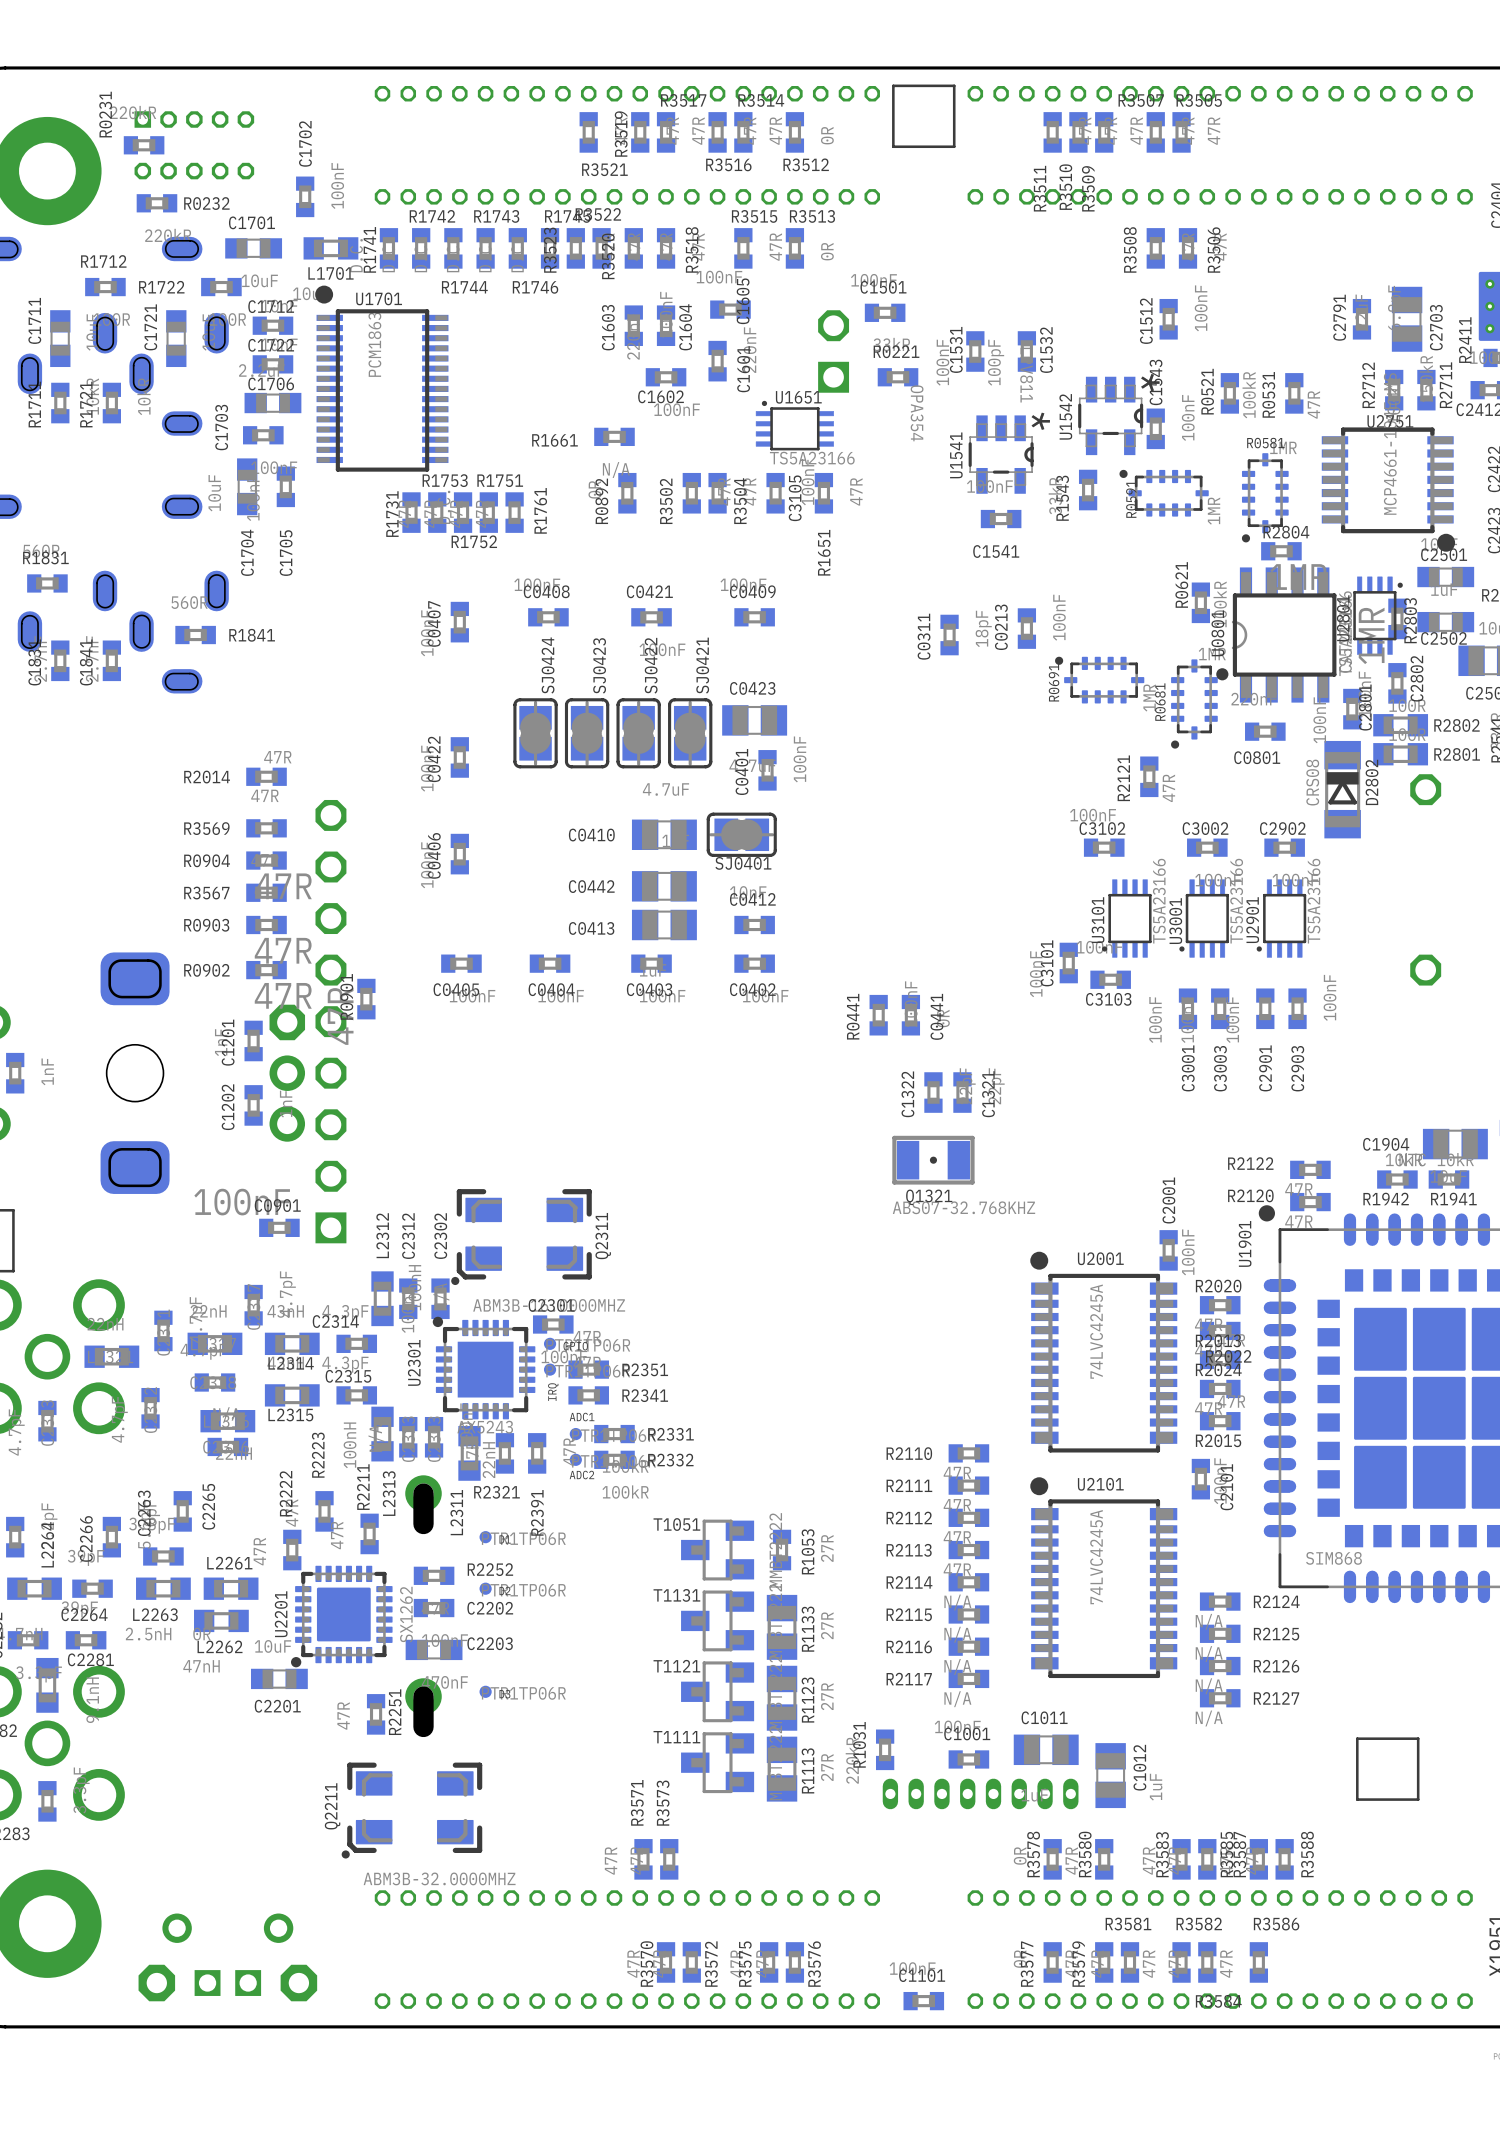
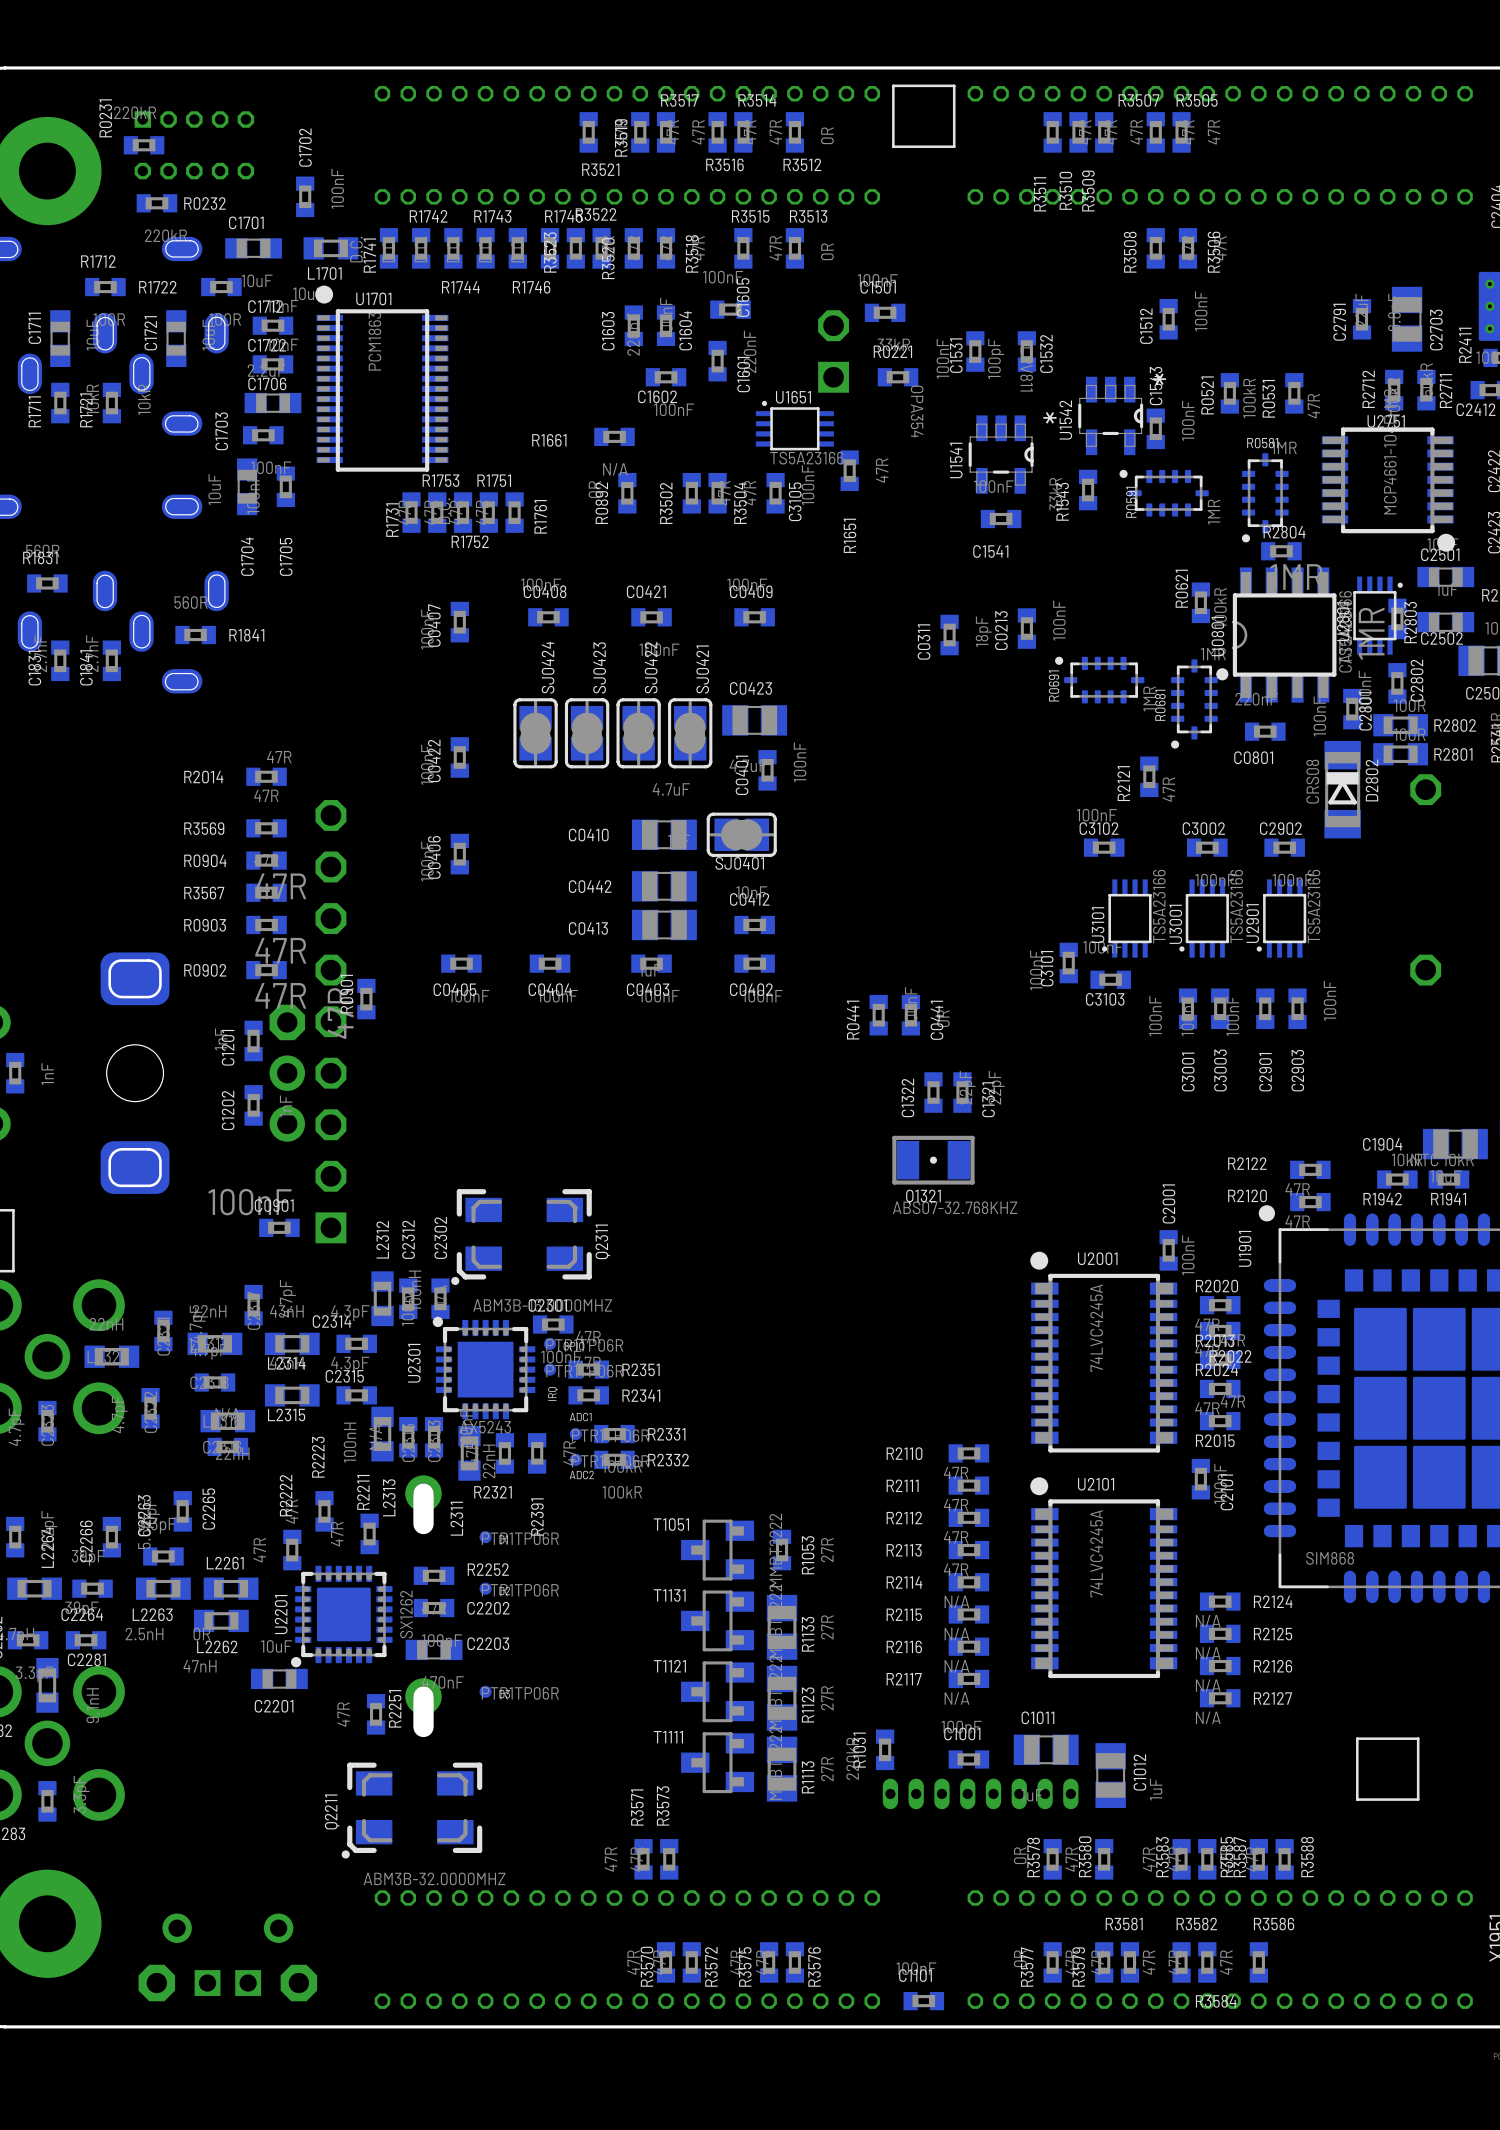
R1651 position: (823, 493) -> (849, 470)

